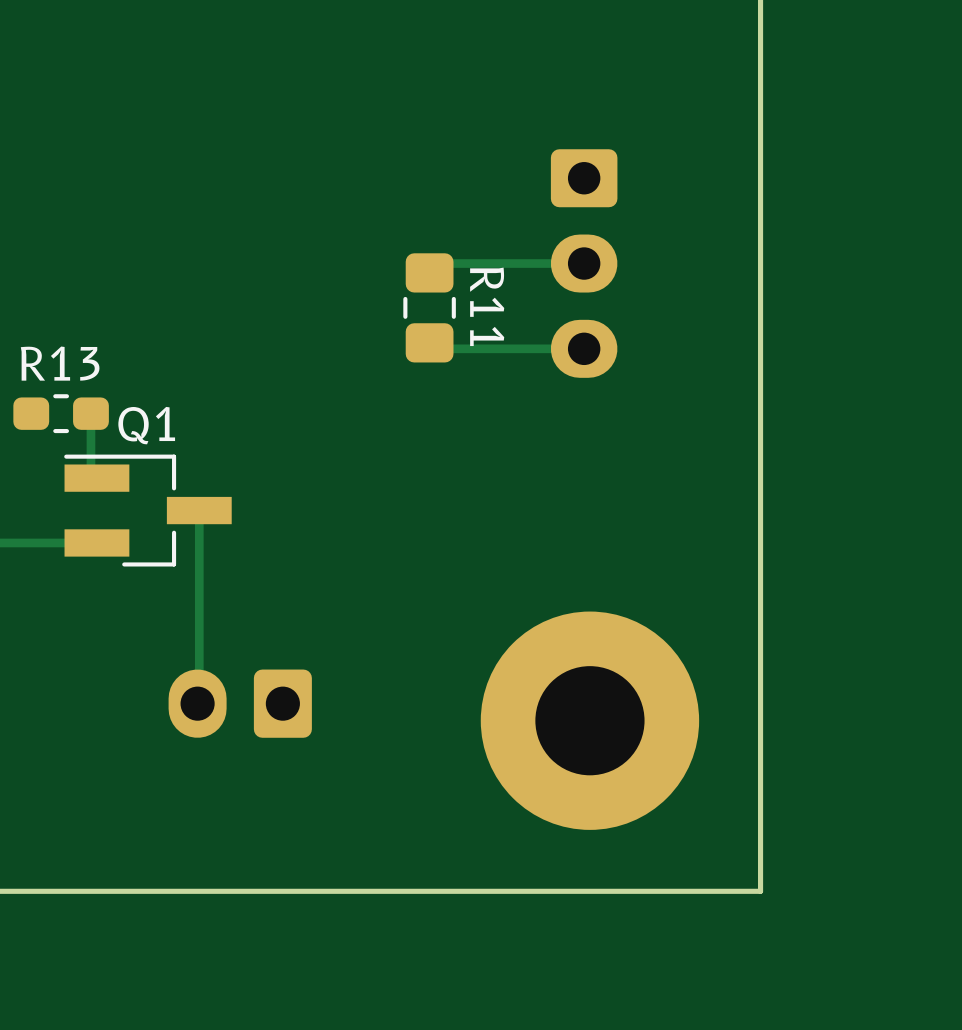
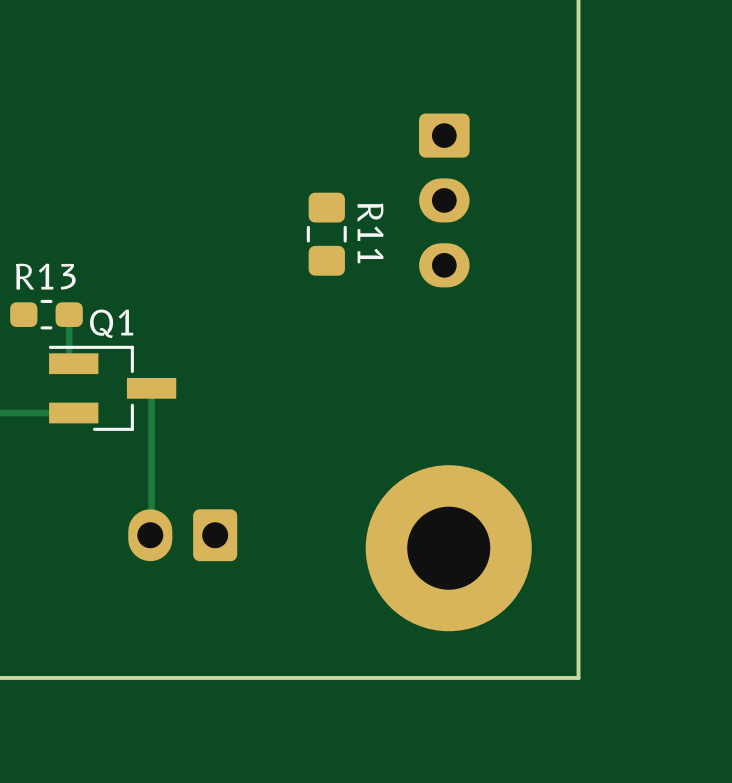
track: (584, 263) (438, 263) (429, 272) -> none
track: (429, 342) (435, 348) (584, 348) -> none

